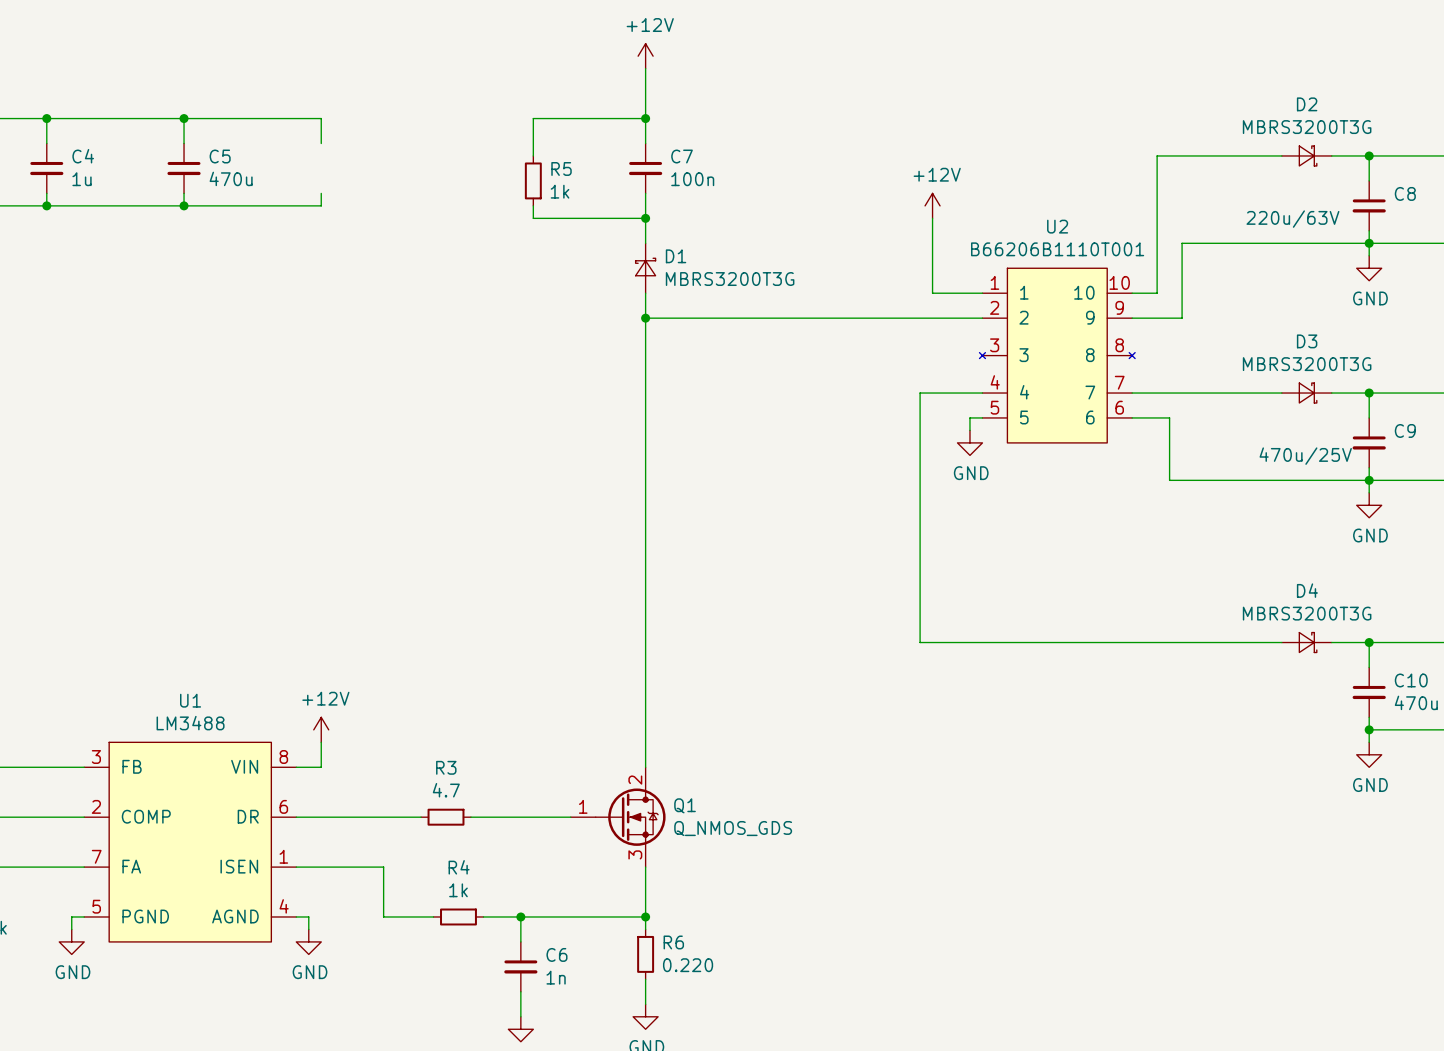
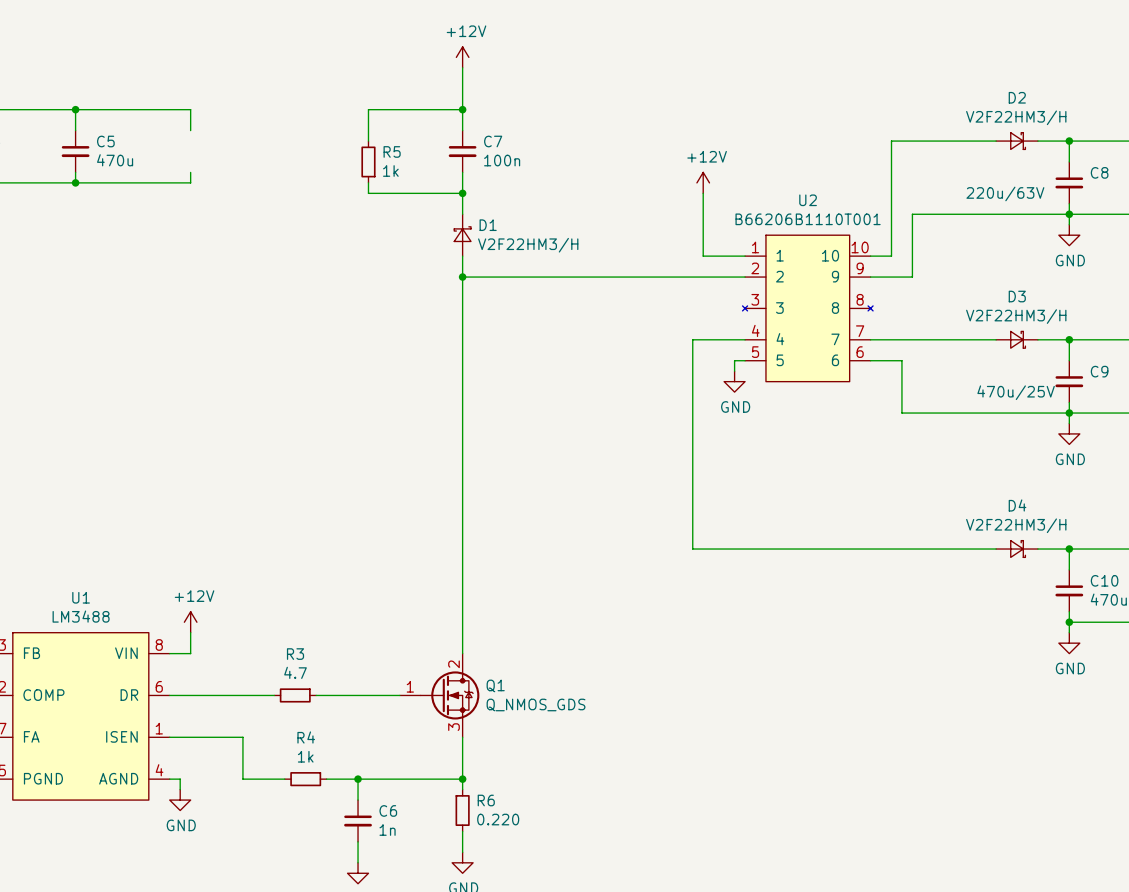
D2 value: MBRS3200T3G (1307, 127) -> V2F22HM3/H (1016, 117)
D1 value: MBRS3200T3G (730, 279) -> V2F22HM3/H (528, 245)
D3 value: MBRS3200T3G (1307, 364) -> V2F22HM3/H (1016, 316)
D4 value: MBRS3200T3G (1307, 613) -> V2F22HM3/H (1016, 525)

